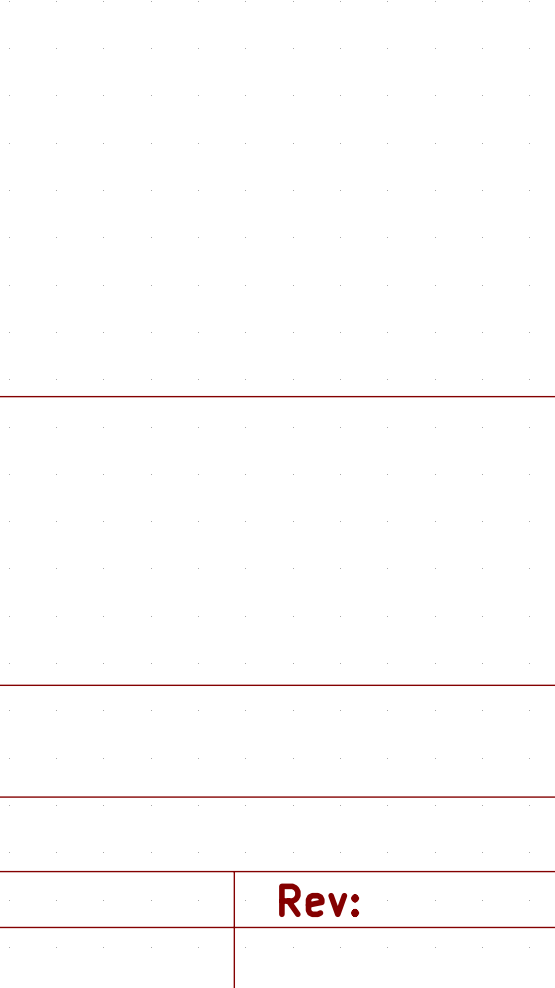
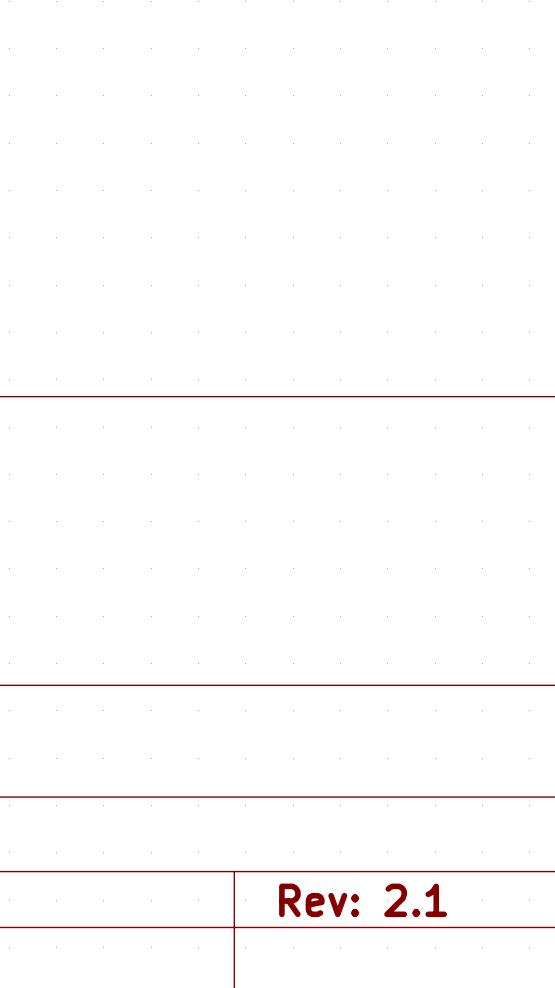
title block: Rev: (319, 900) -> Rev: 2.1 (363, 900)

